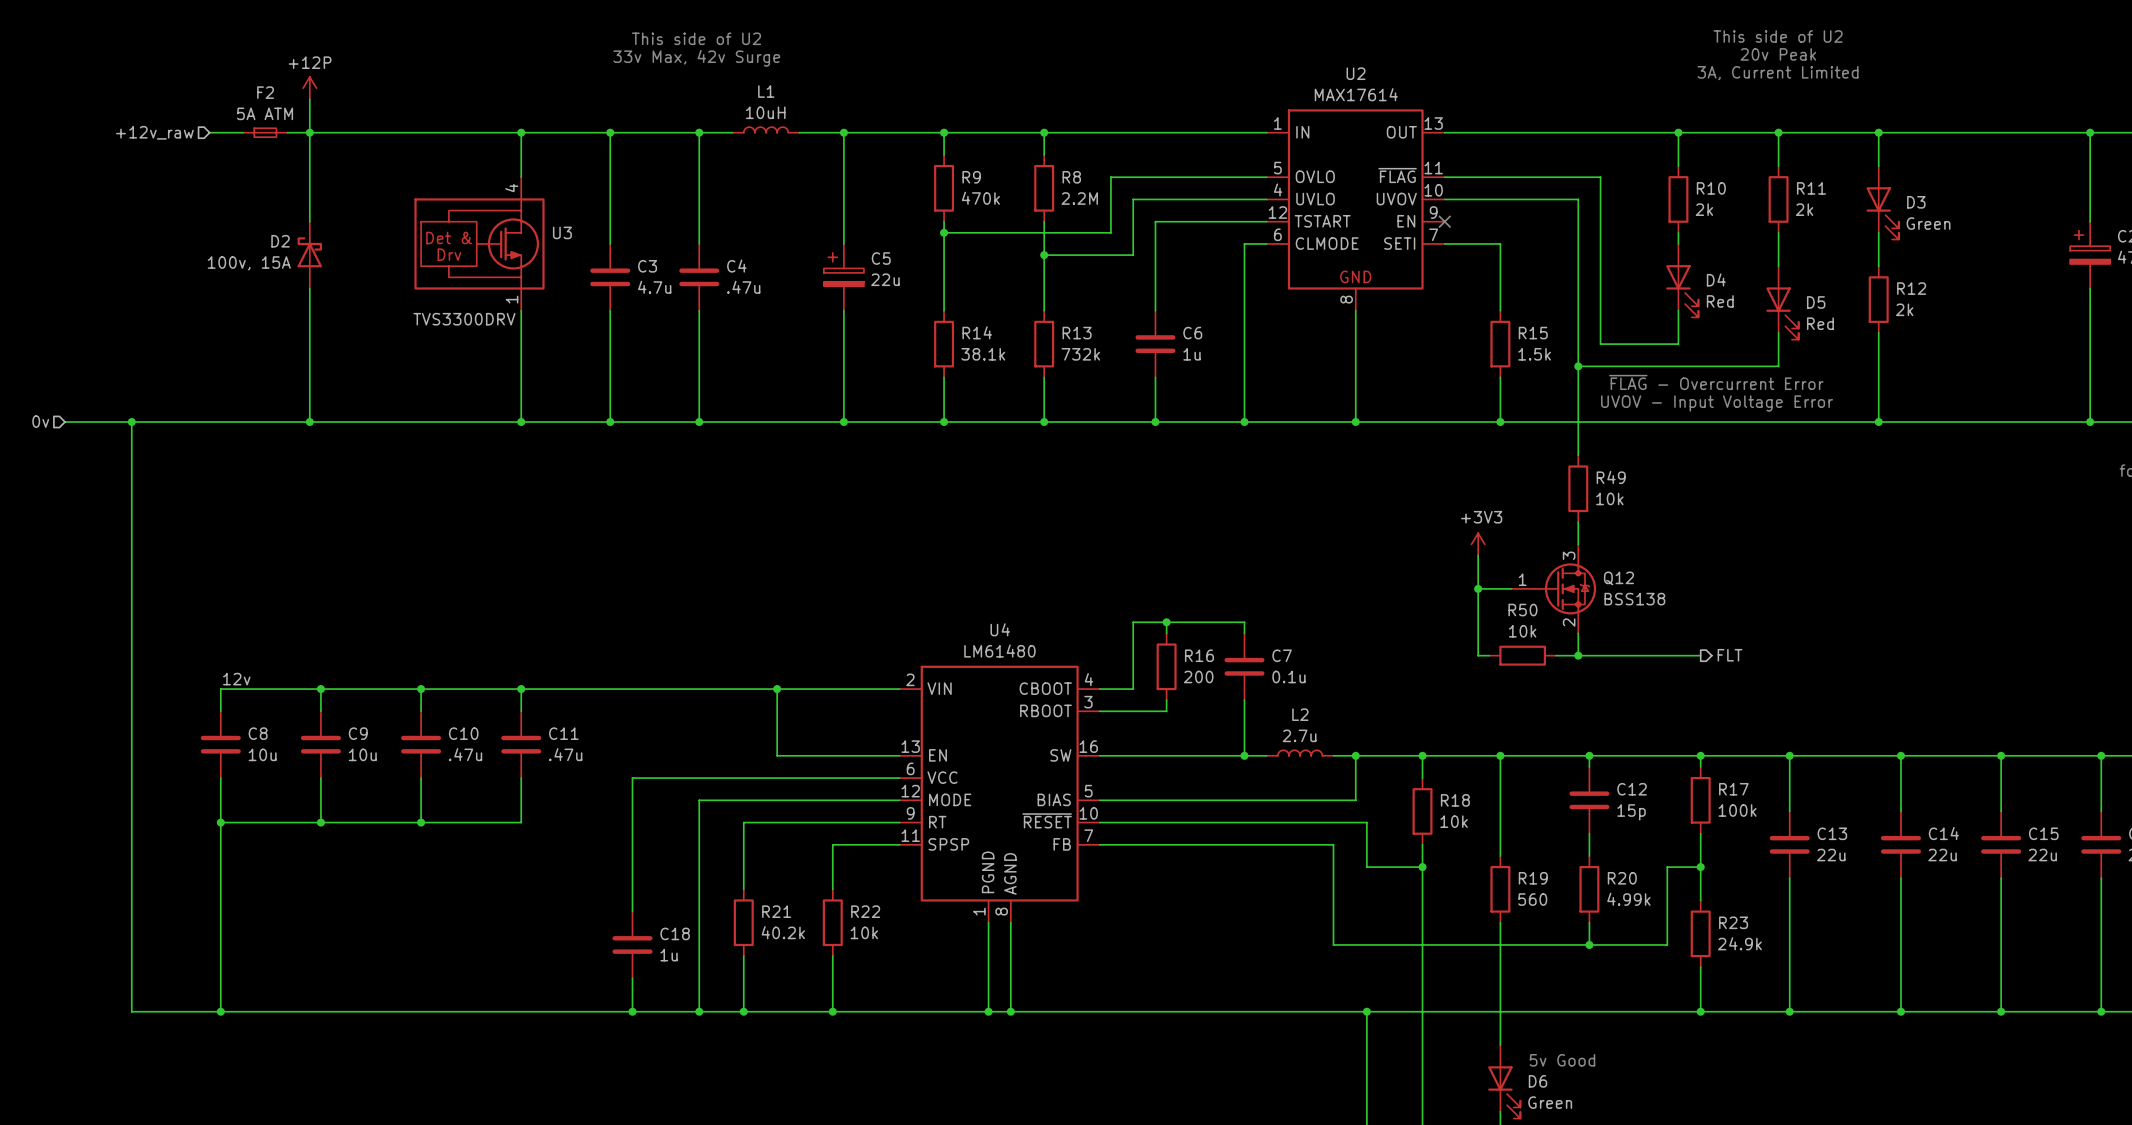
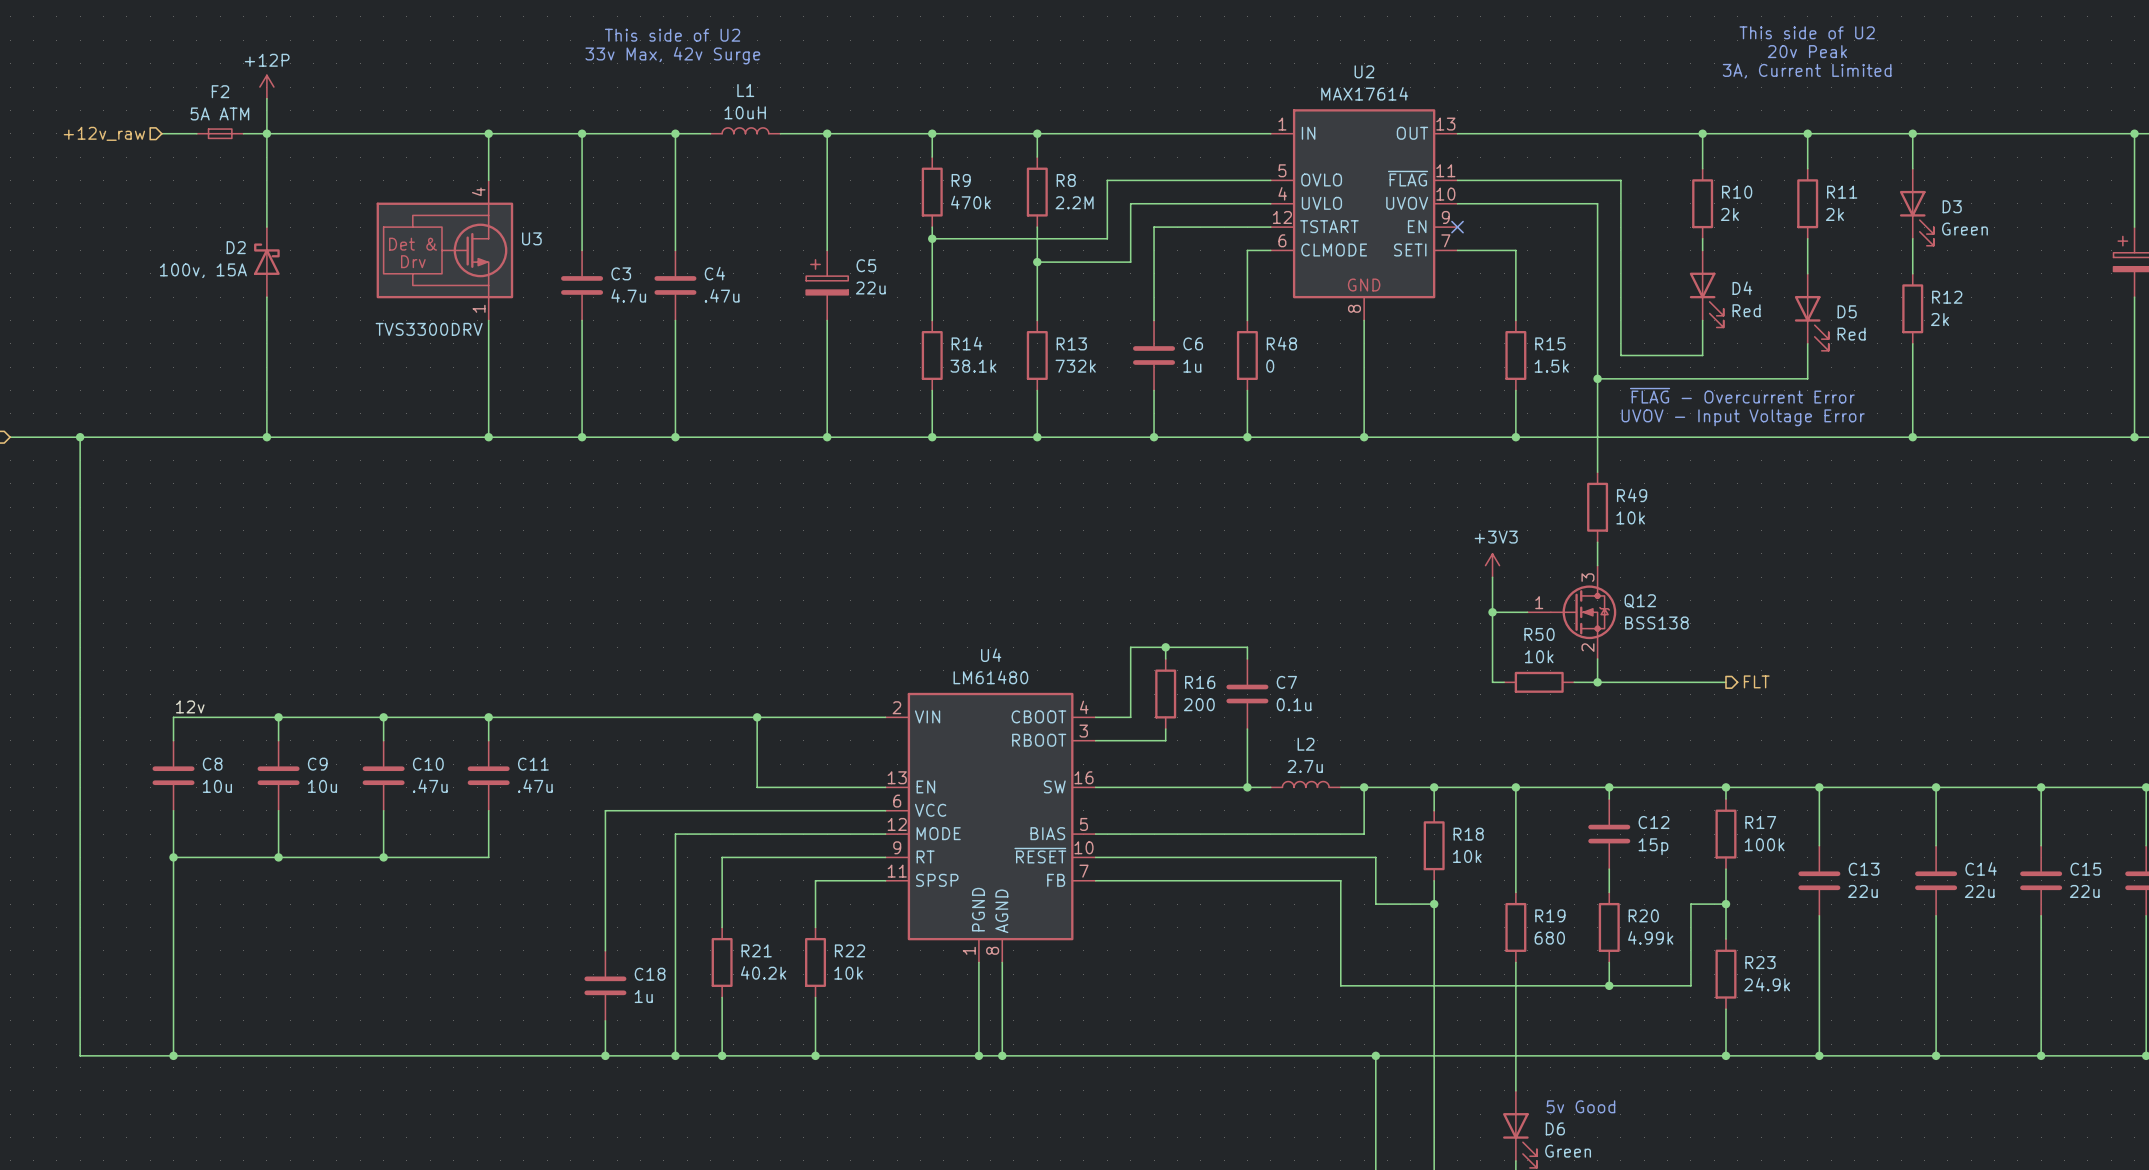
wire: (1244, 310) (1244, 377) -> none
R48: none -> 0 (1247, 355)
R19 value: 560 (1532, 899) -> 680 (1549, 938)

